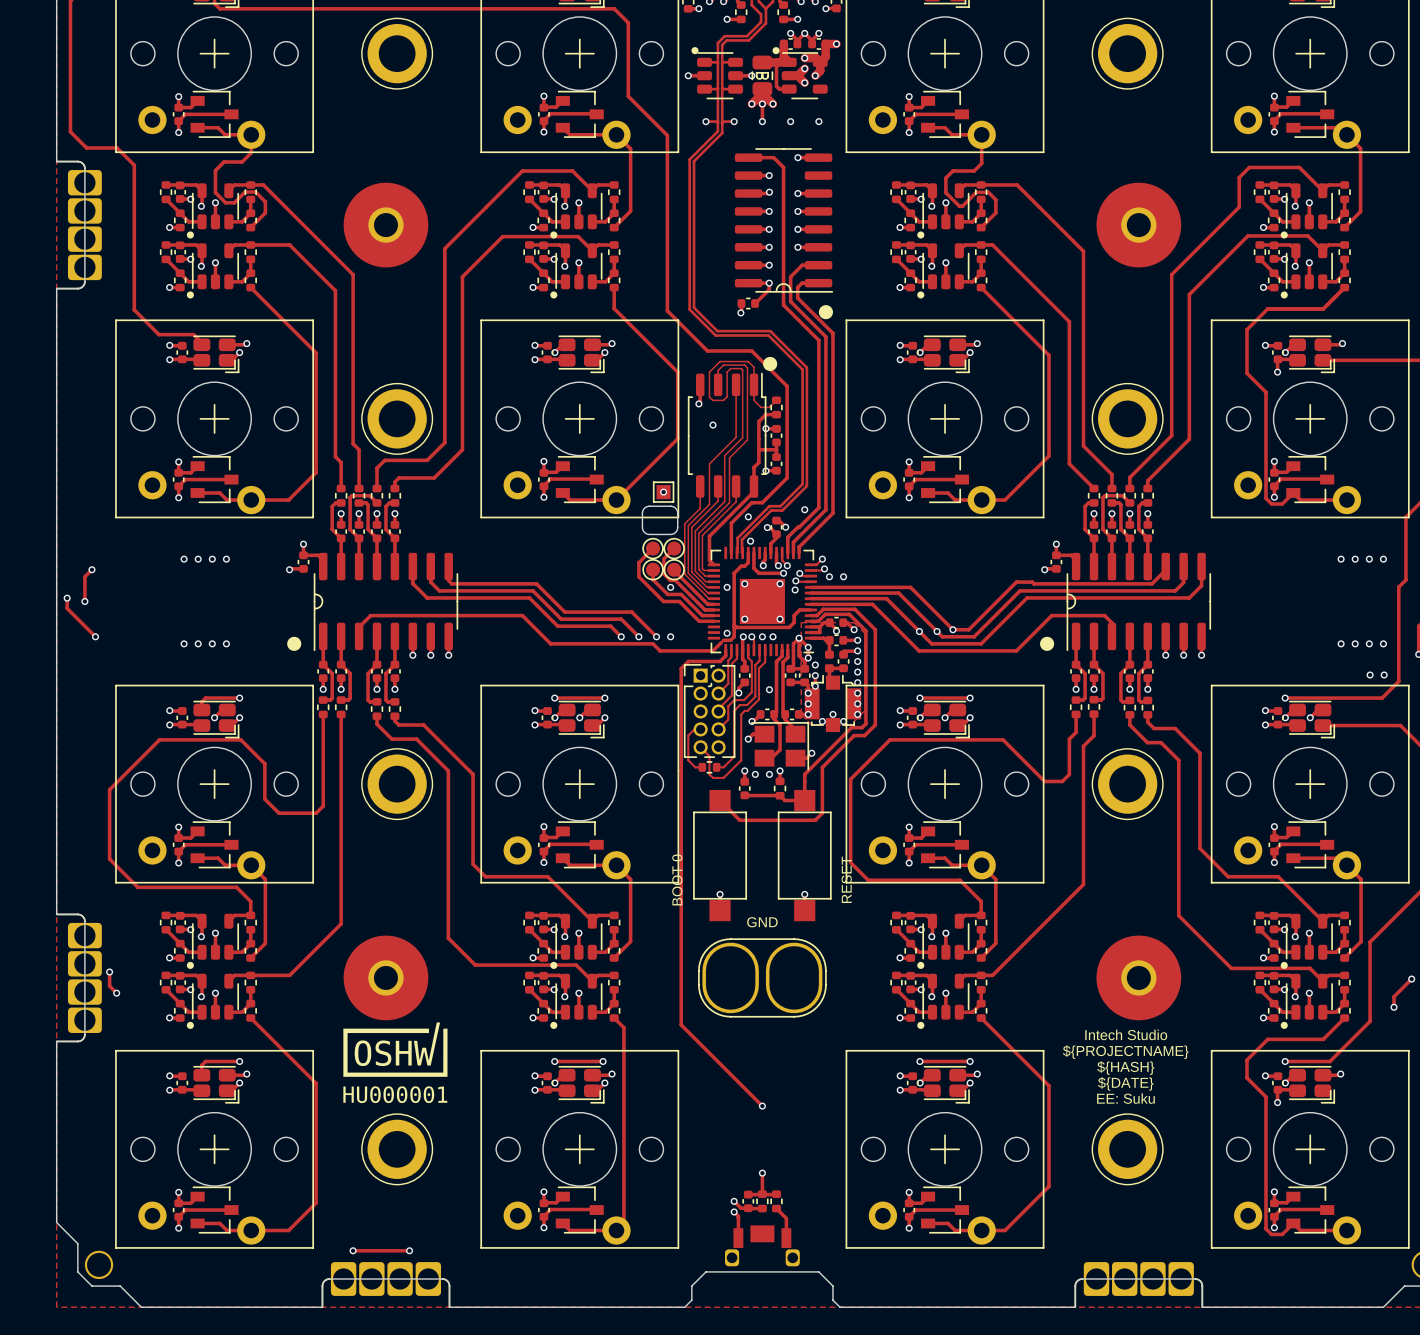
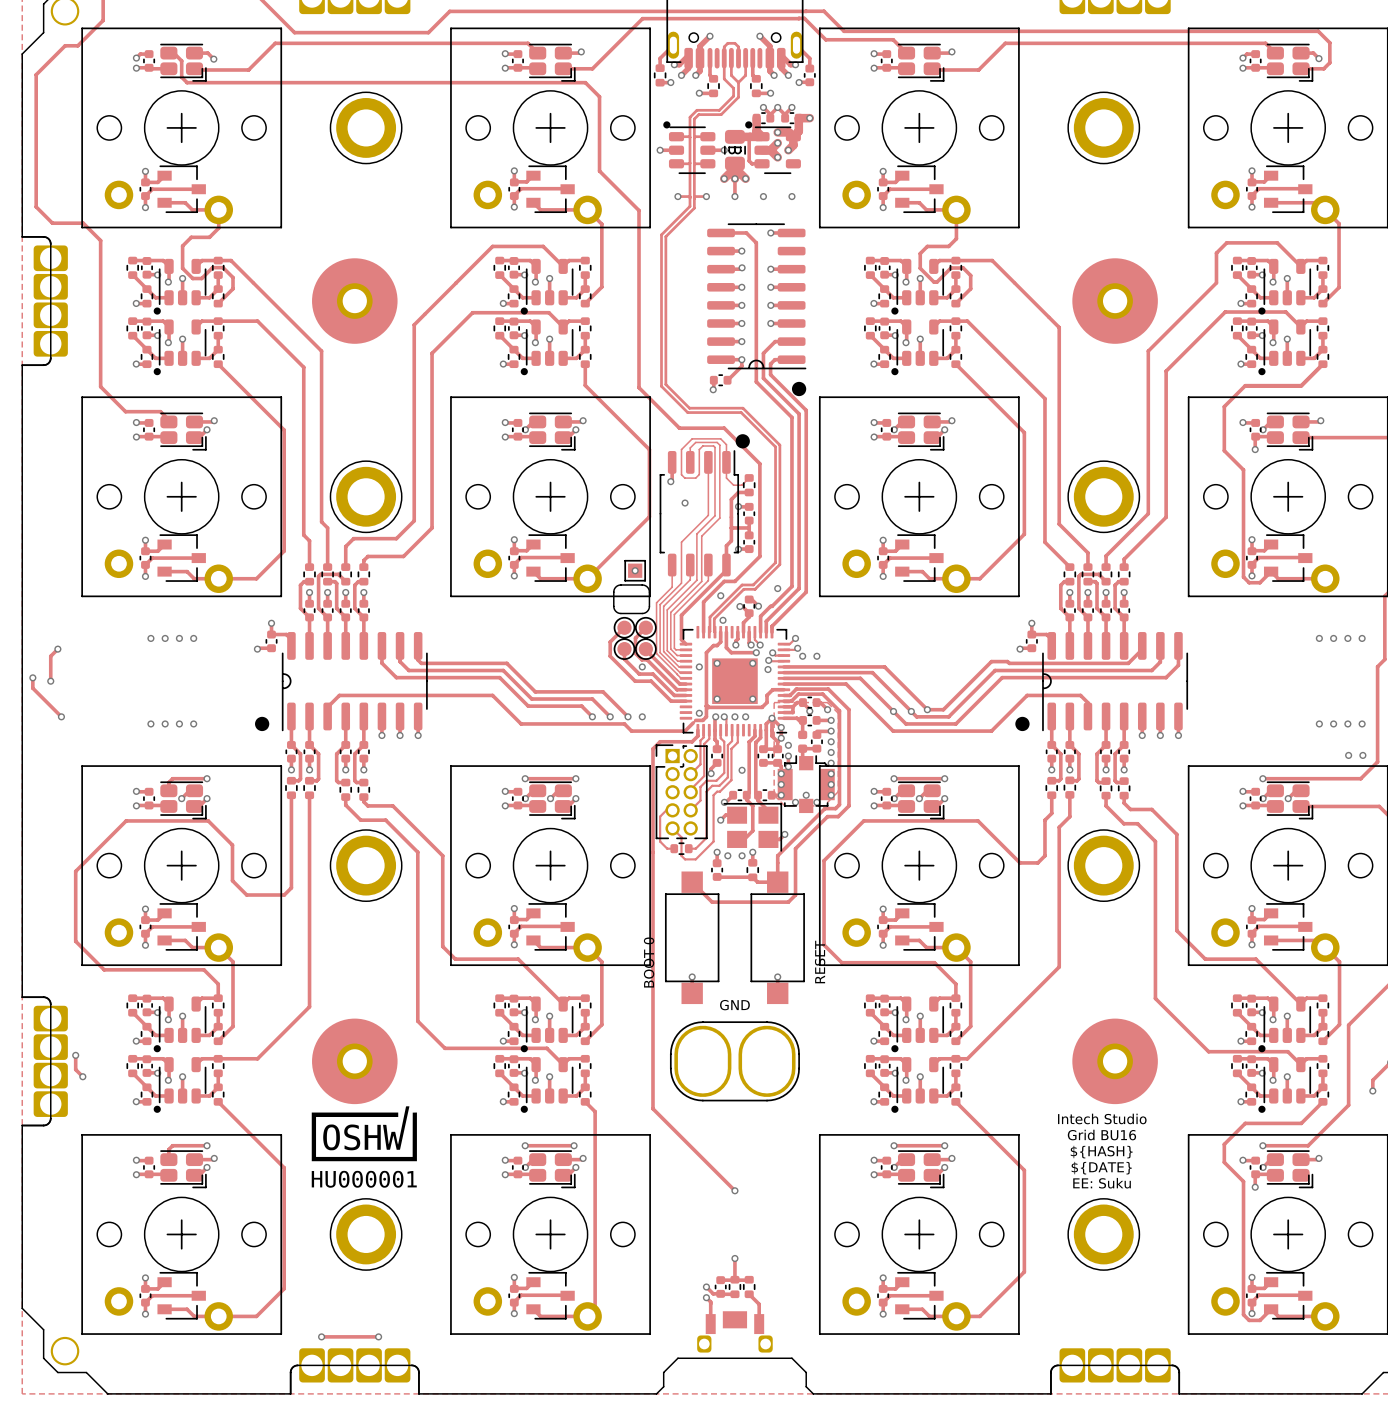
text: ${PROJECTNAME} (1125, 1052) -> Grid BU16 (1101, 1135)

